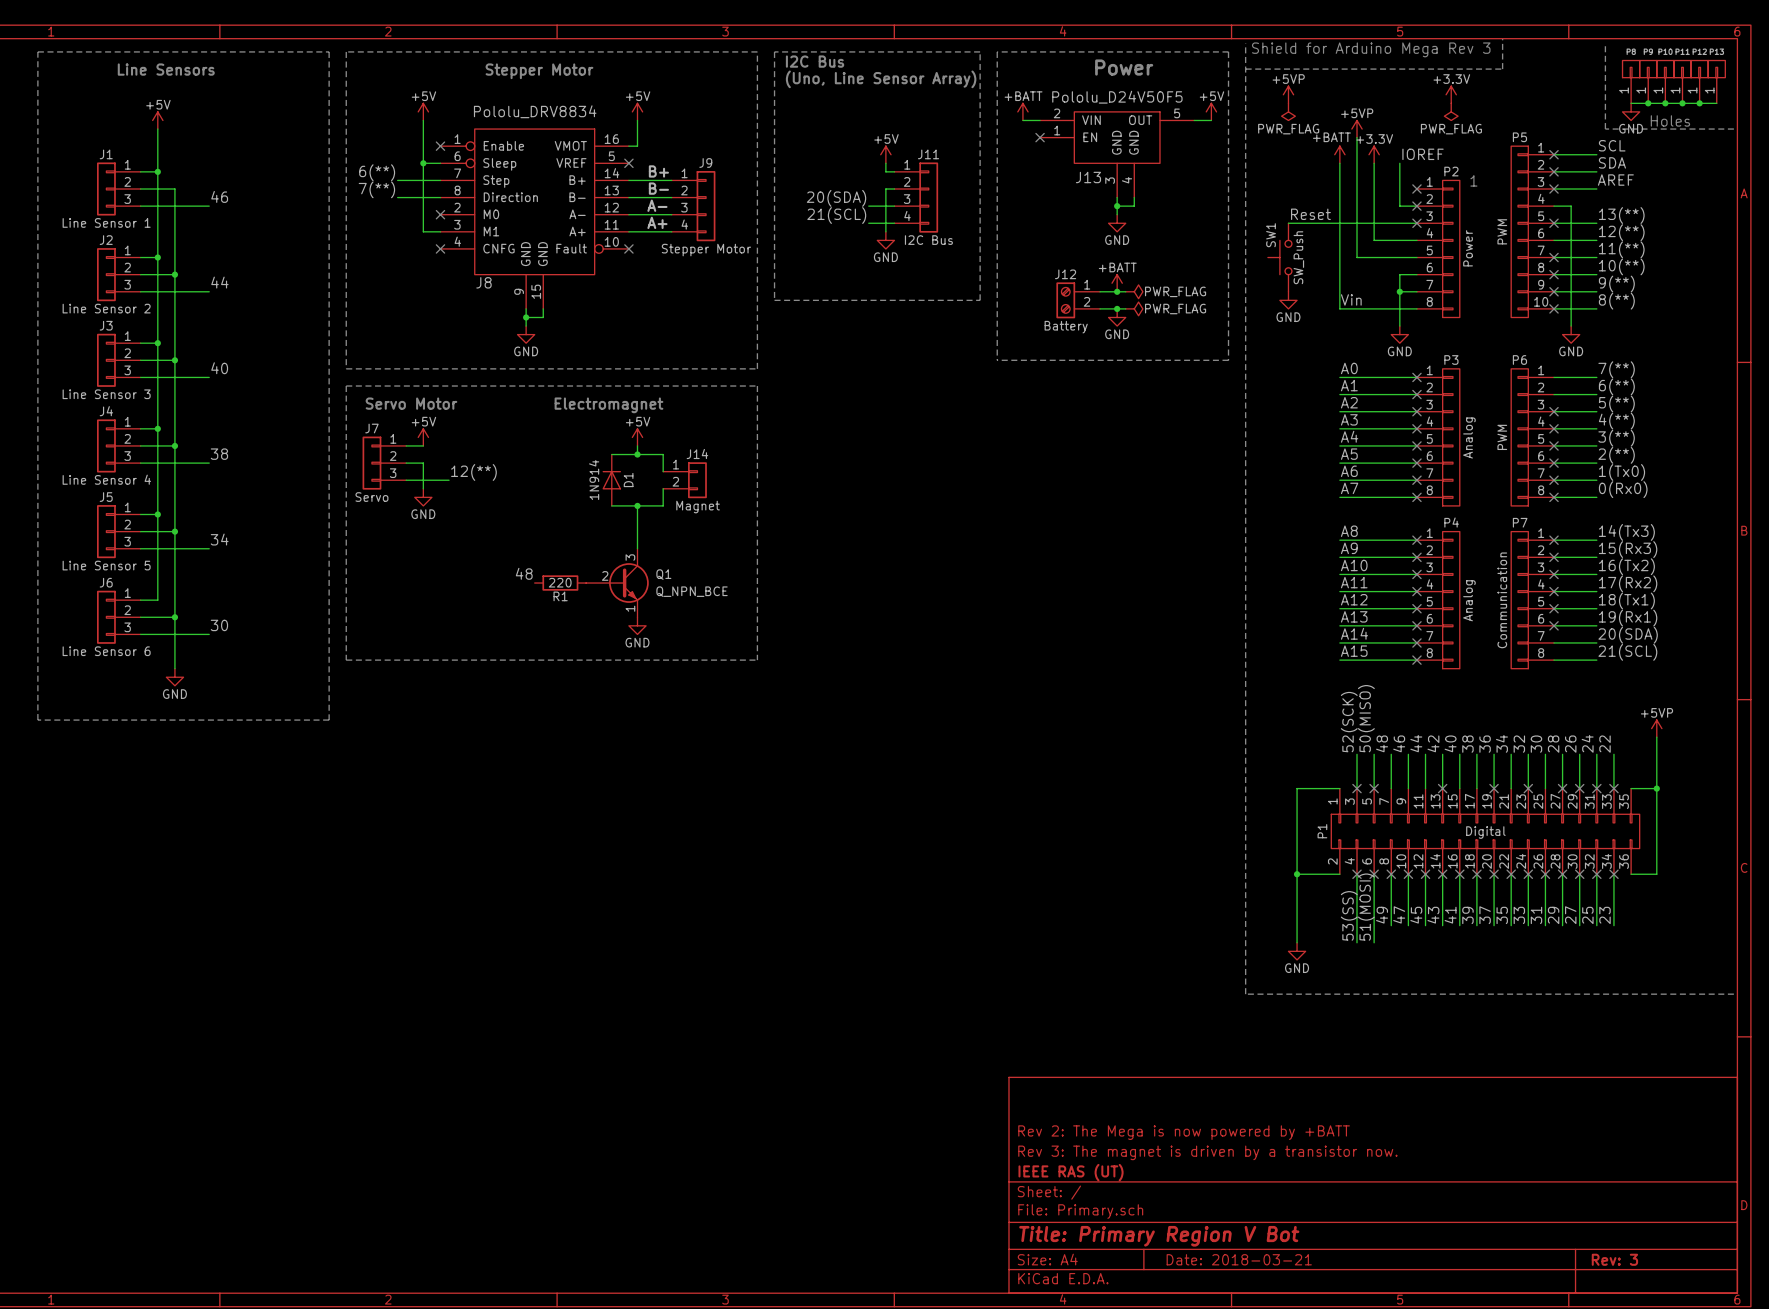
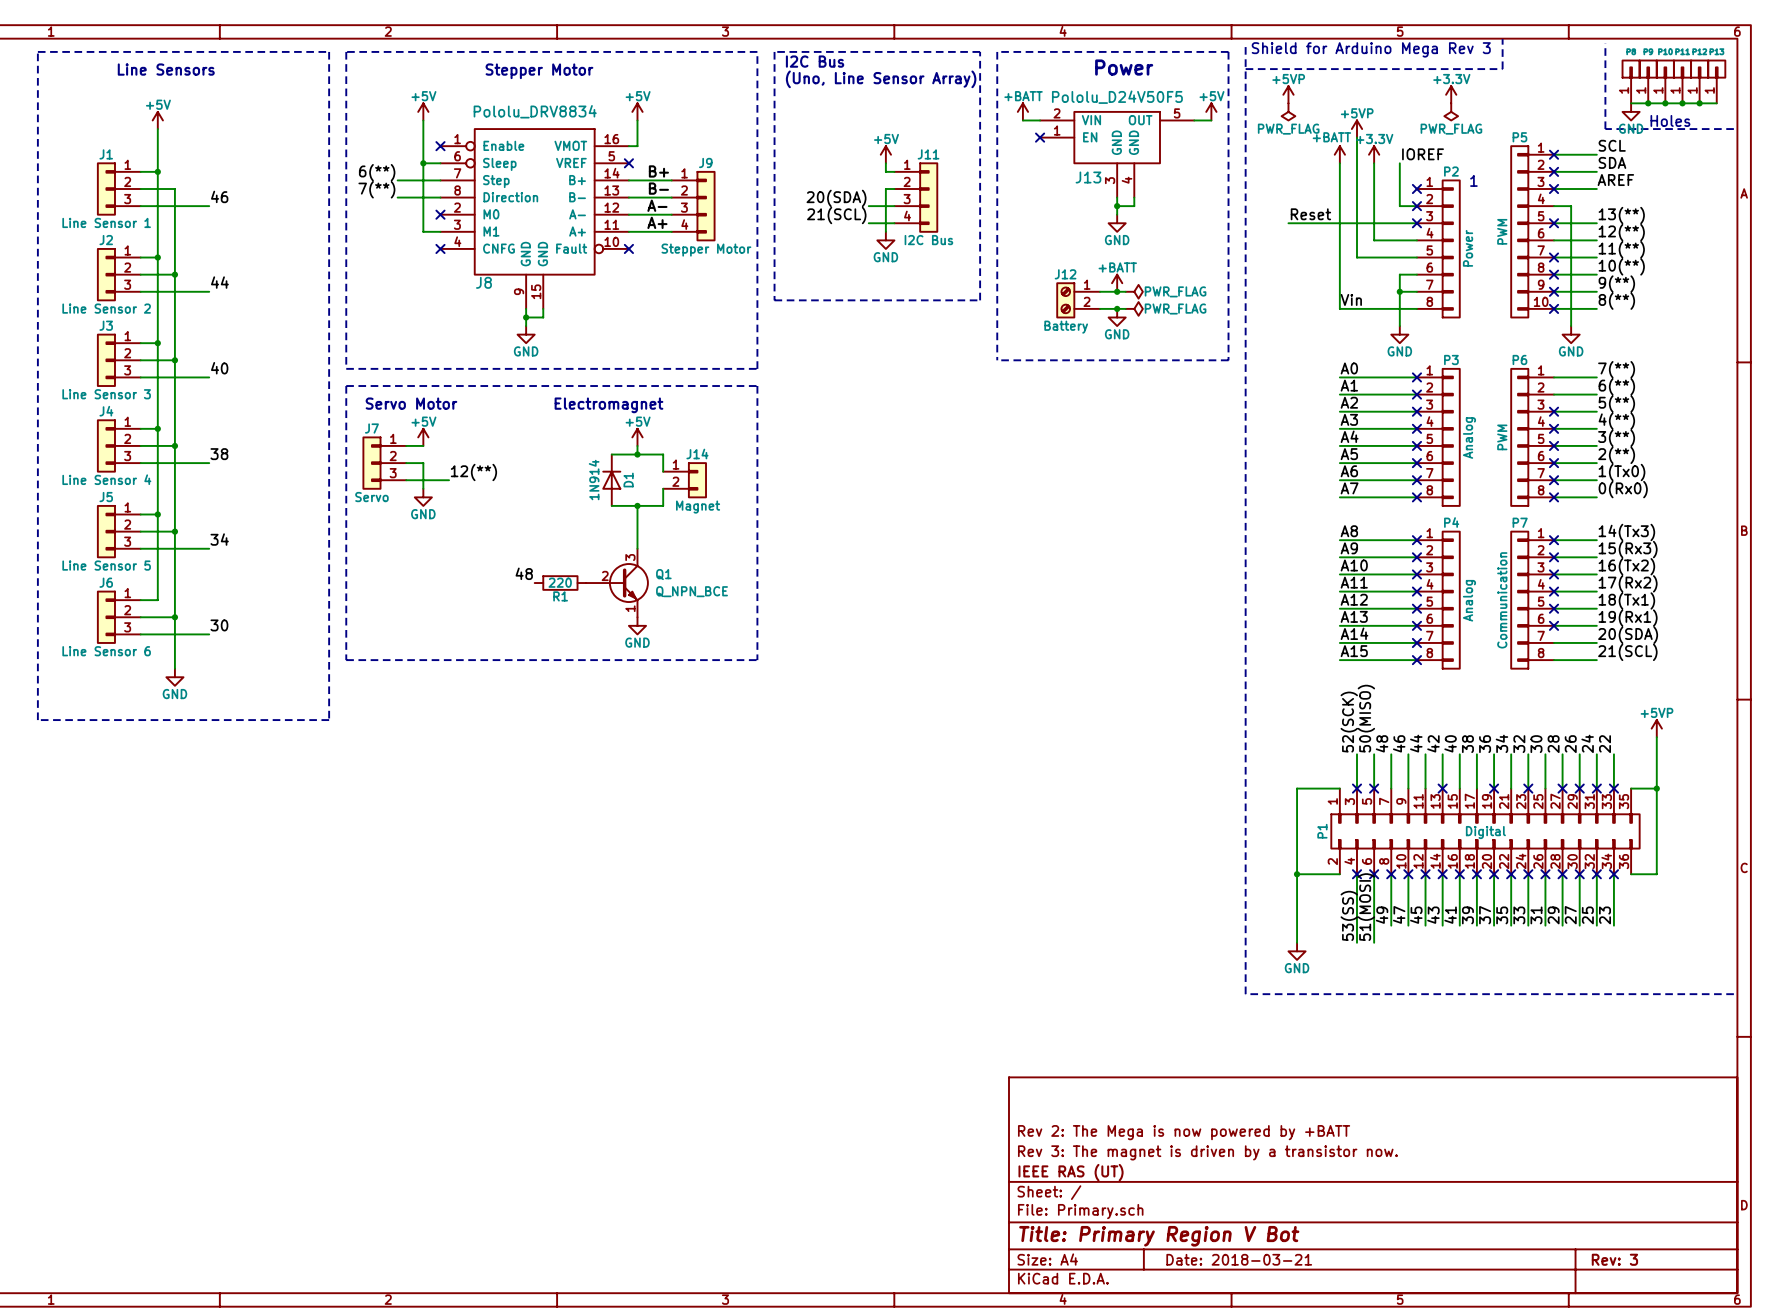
SW1: SW_Push (1279, 257) -> none
power symbol: GND (1288, 300) -> none

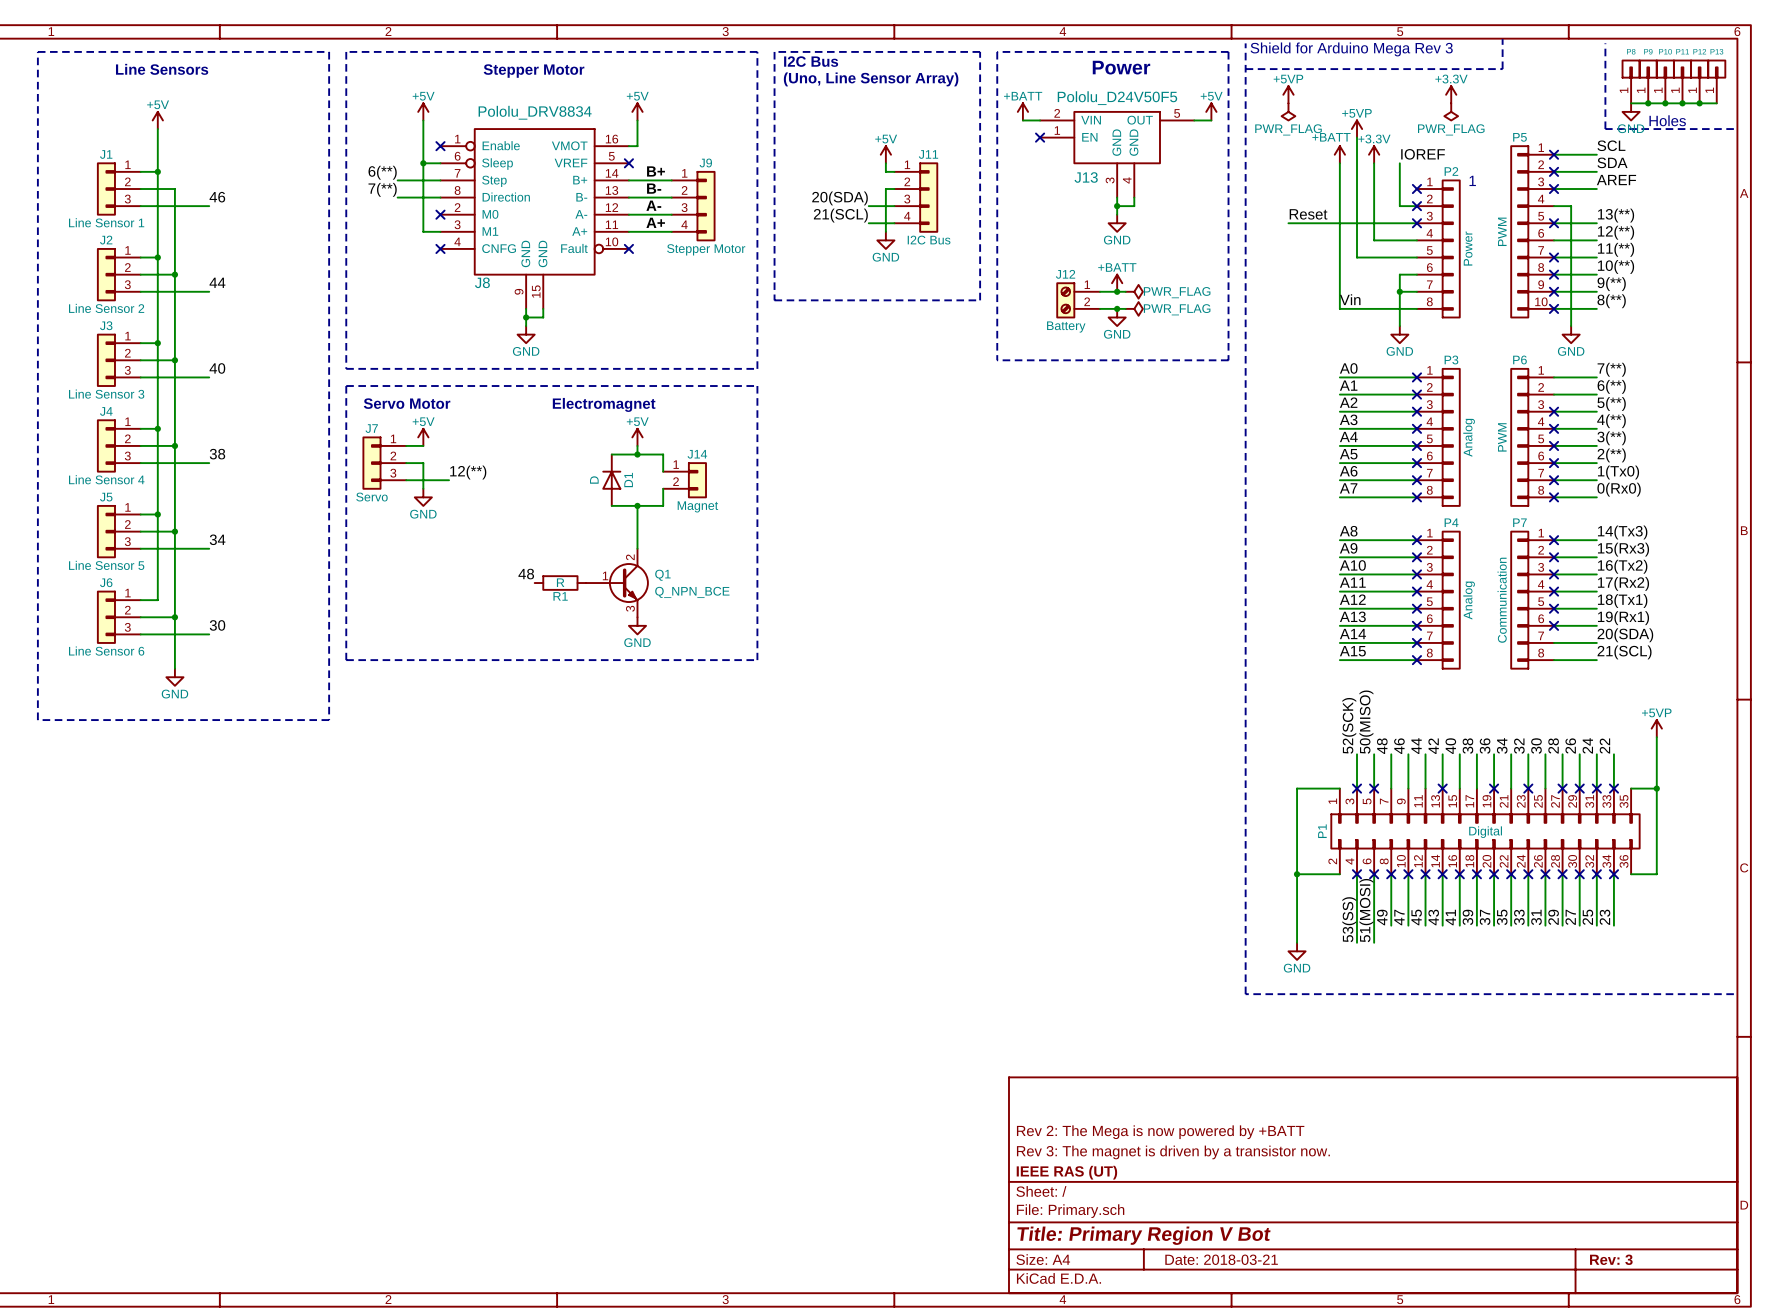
D1 value: 1N914 (594, 480) -> D (594, 480)
Q1 pin number: 3 (630, 557) -> 2 (630, 557)
Q1 pin number: 2 (605, 575) -> 1 (605, 575)
R1 value: 220 (560, 582) -> R (560, 582)
Q1 pin number: 1 (630, 608) -> 3 (630, 608)

